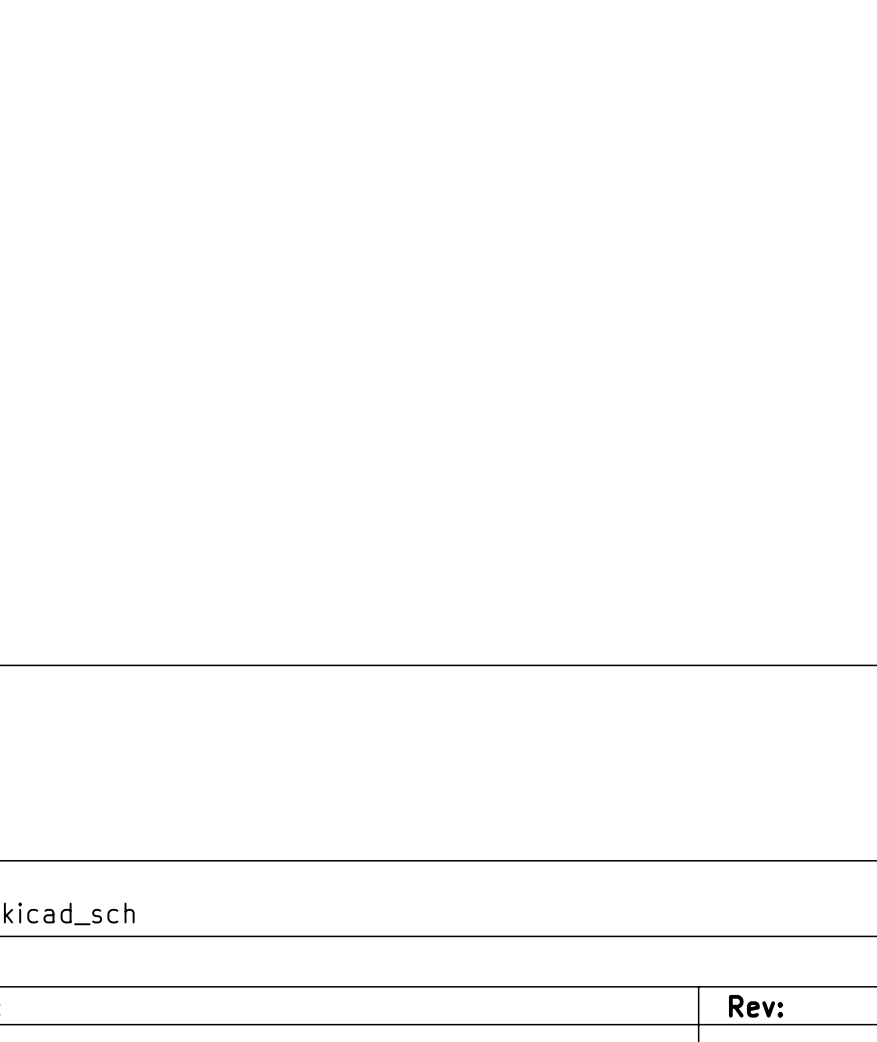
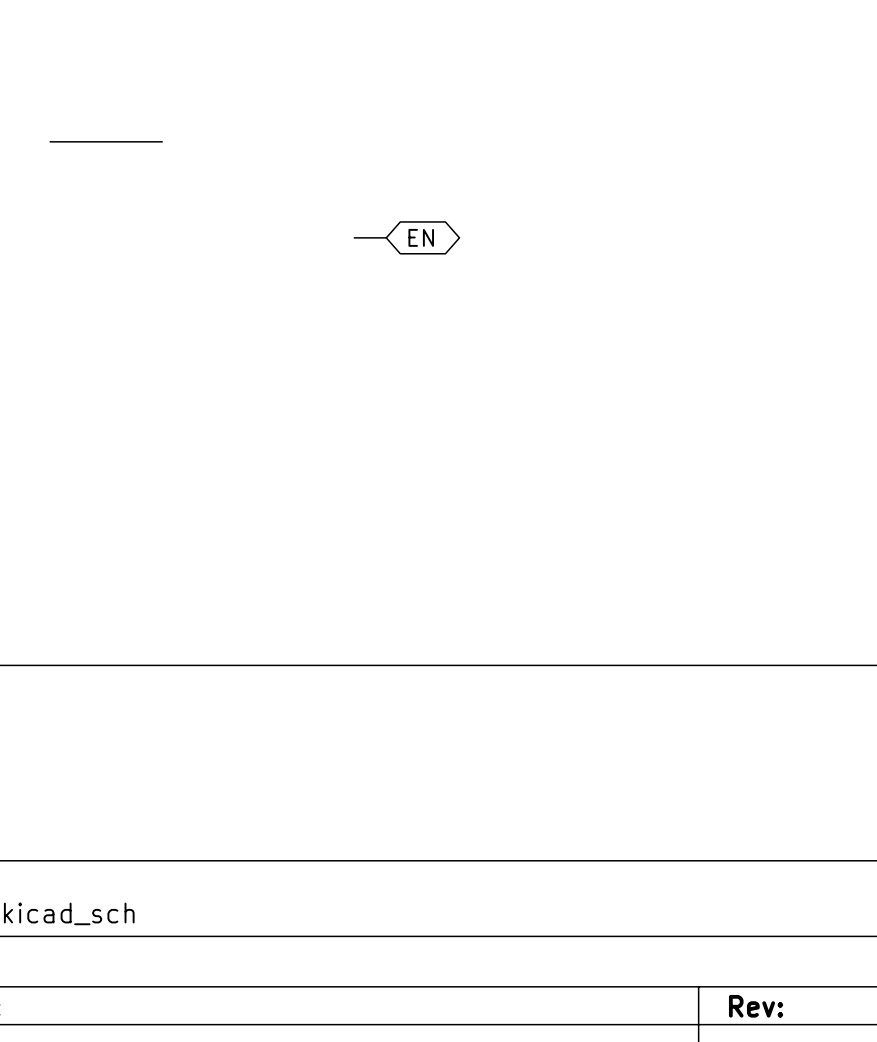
wire: none -> (50, 141) (162, 141)
wire: none -> (354, 237) (386, 237)
global label: none -> EN (421, 237)

